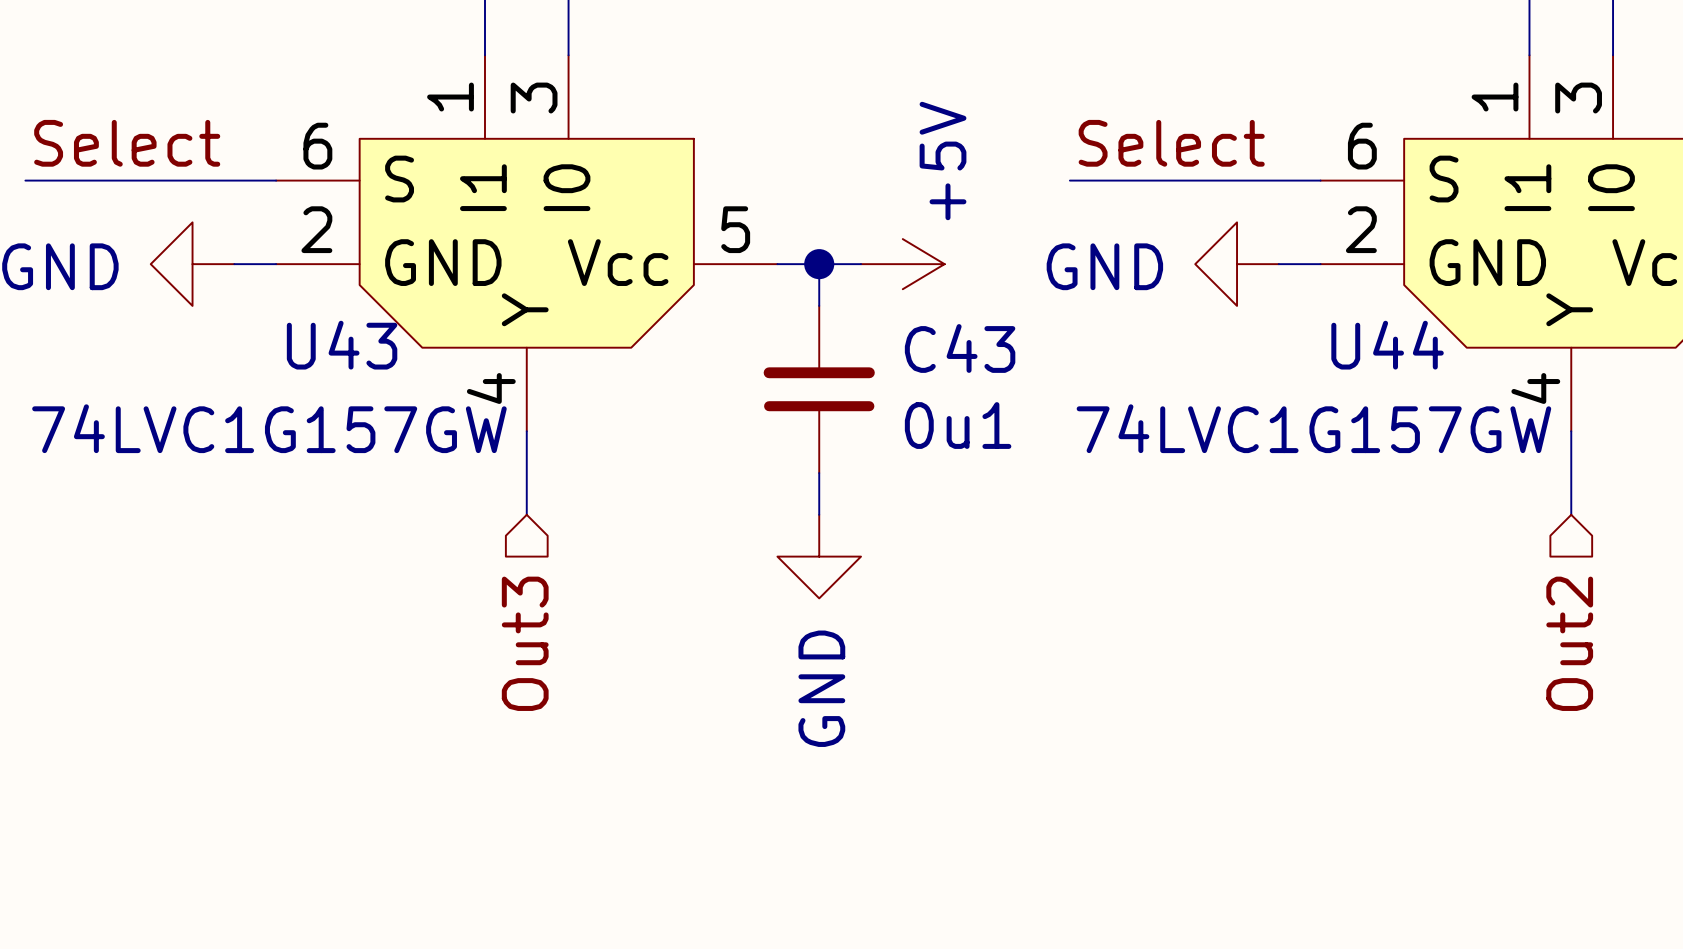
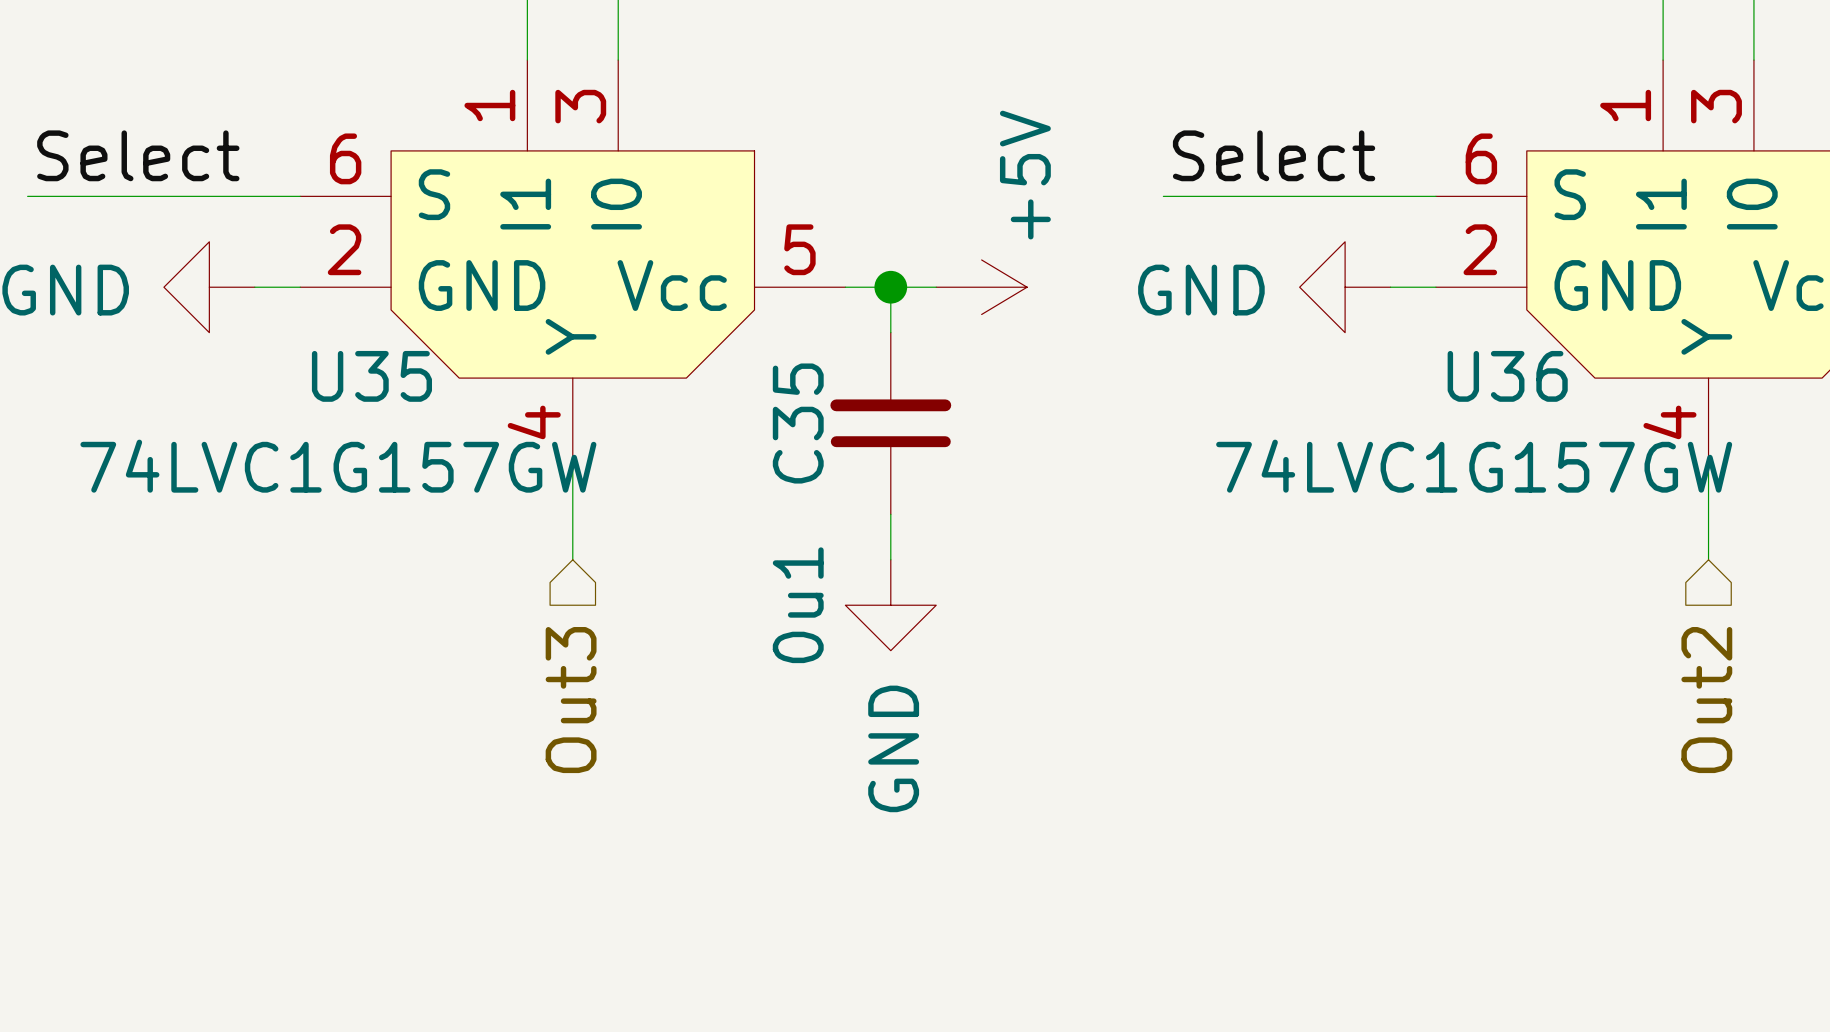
U43 name: U43 (342, 345) -> U35 (371, 376)
U44 name: U44 (1387, 345) -> U36 (1507, 376)
C43 name: C43 (960, 348) -> C35 (798, 423)
C43 value rotation: 0° (958, 425) -> 90° counterclockwise (798, 605)
C43 value position: 0u1 (958, 425) -> 0u1 (798, 605)
U43 value position: 74LVC1G157GW (269, 428) -> 74LVC1G157GW (338, 466)
U44 value position: 74LVC1G157GW (1313, 428) -> 74LVC1G157GW (1474, 466)

